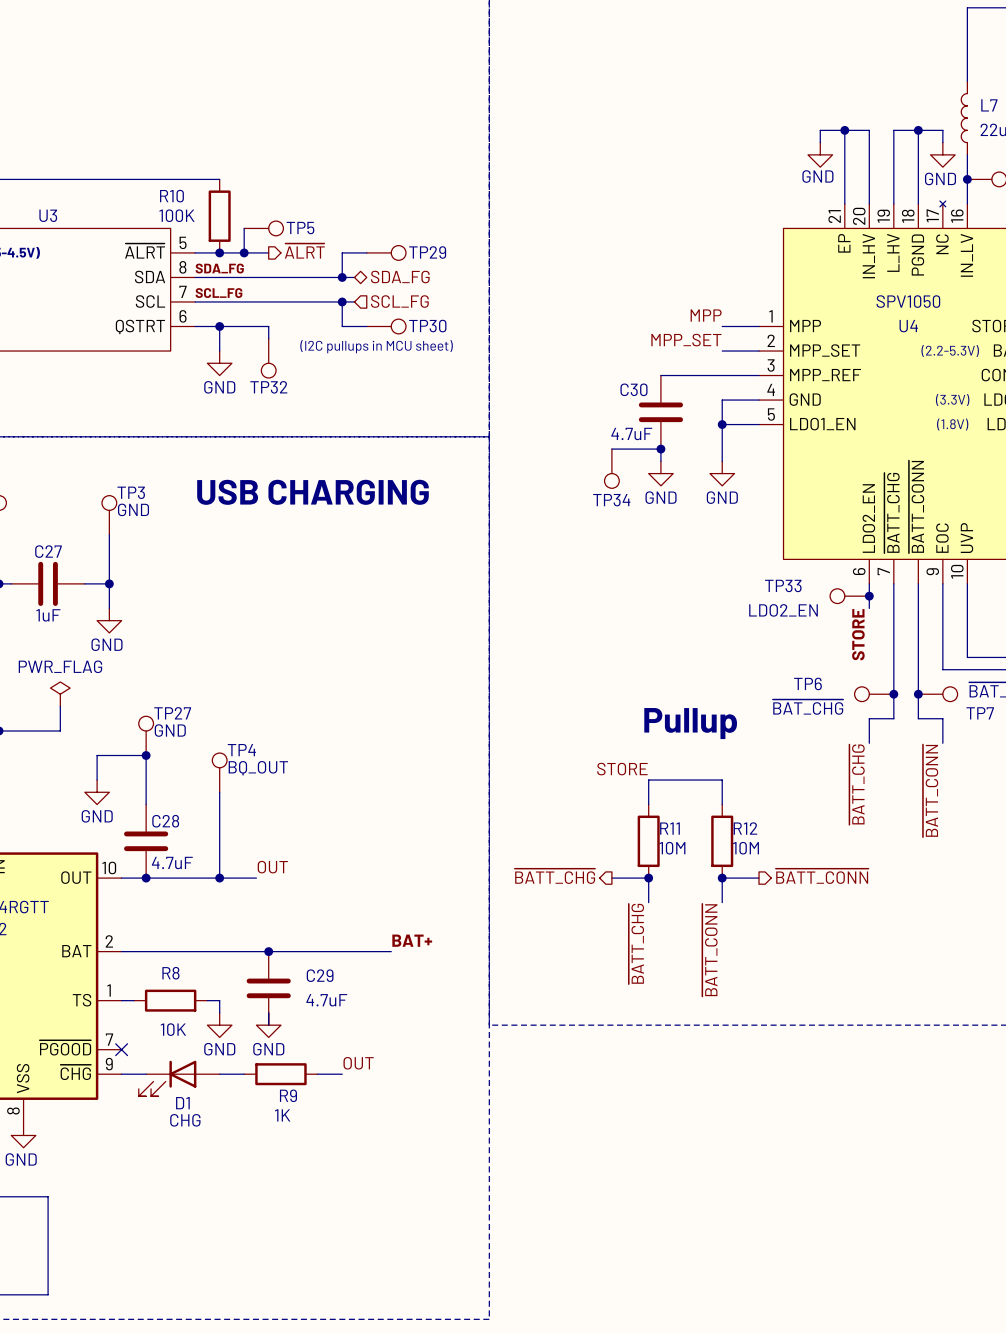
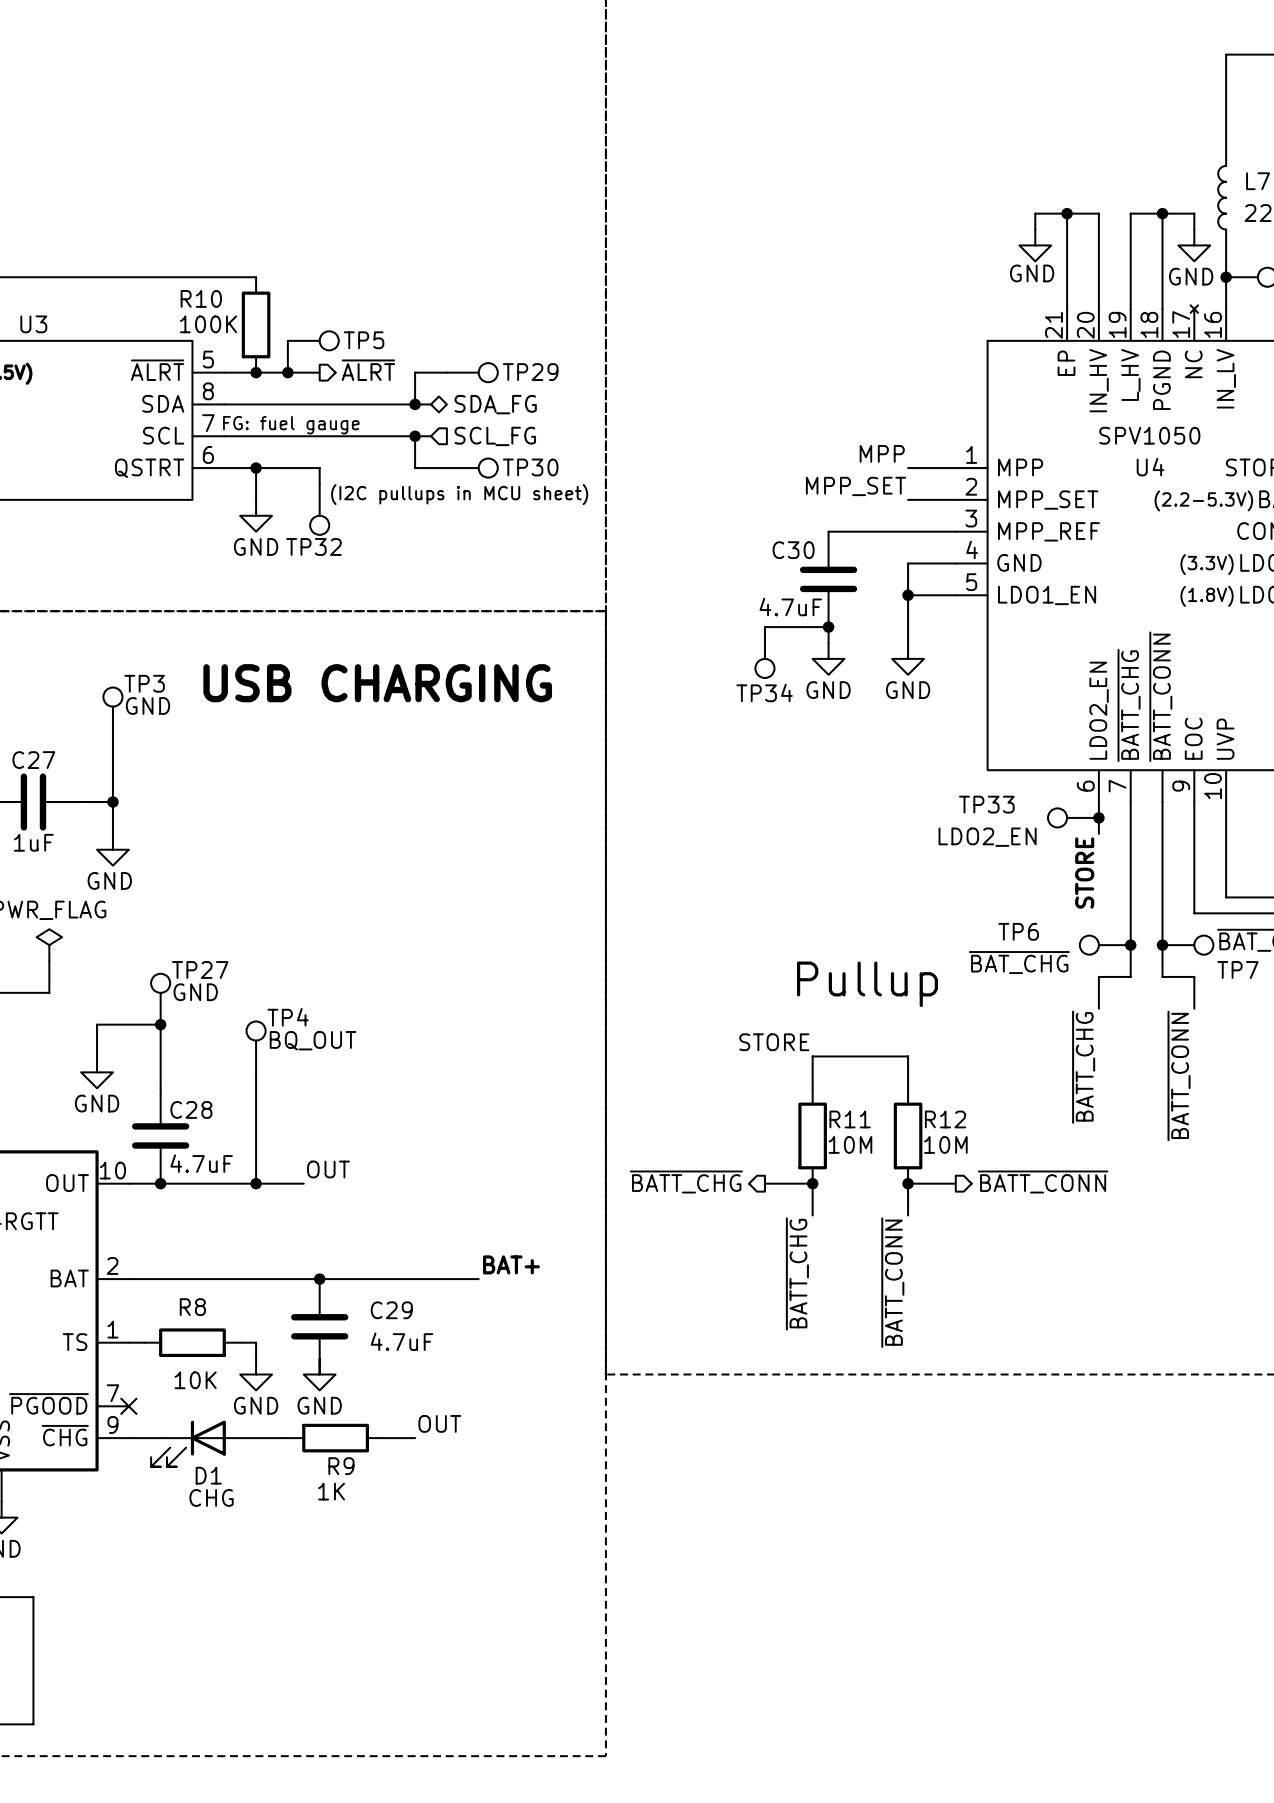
label: SDA_FG (219, 268) -> none
label: SCL_FG (219, 293) -> none
text: none -> FG: fuel gauge (291, 425)

